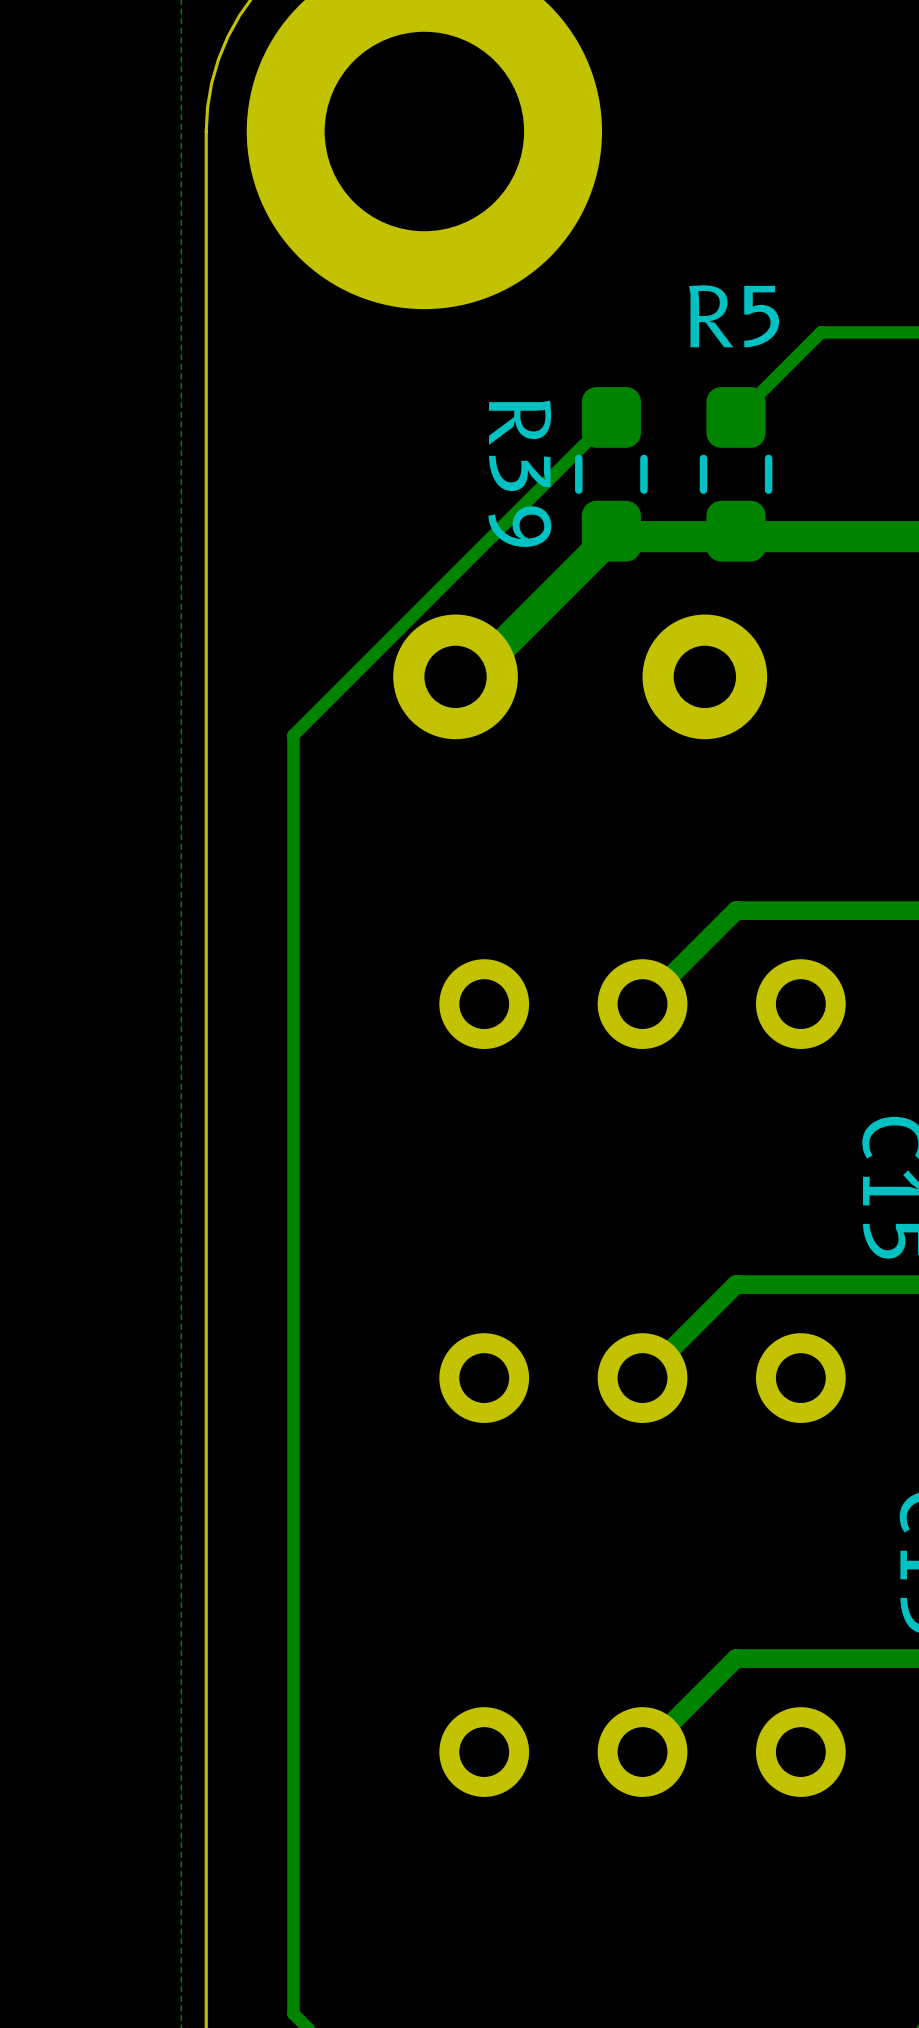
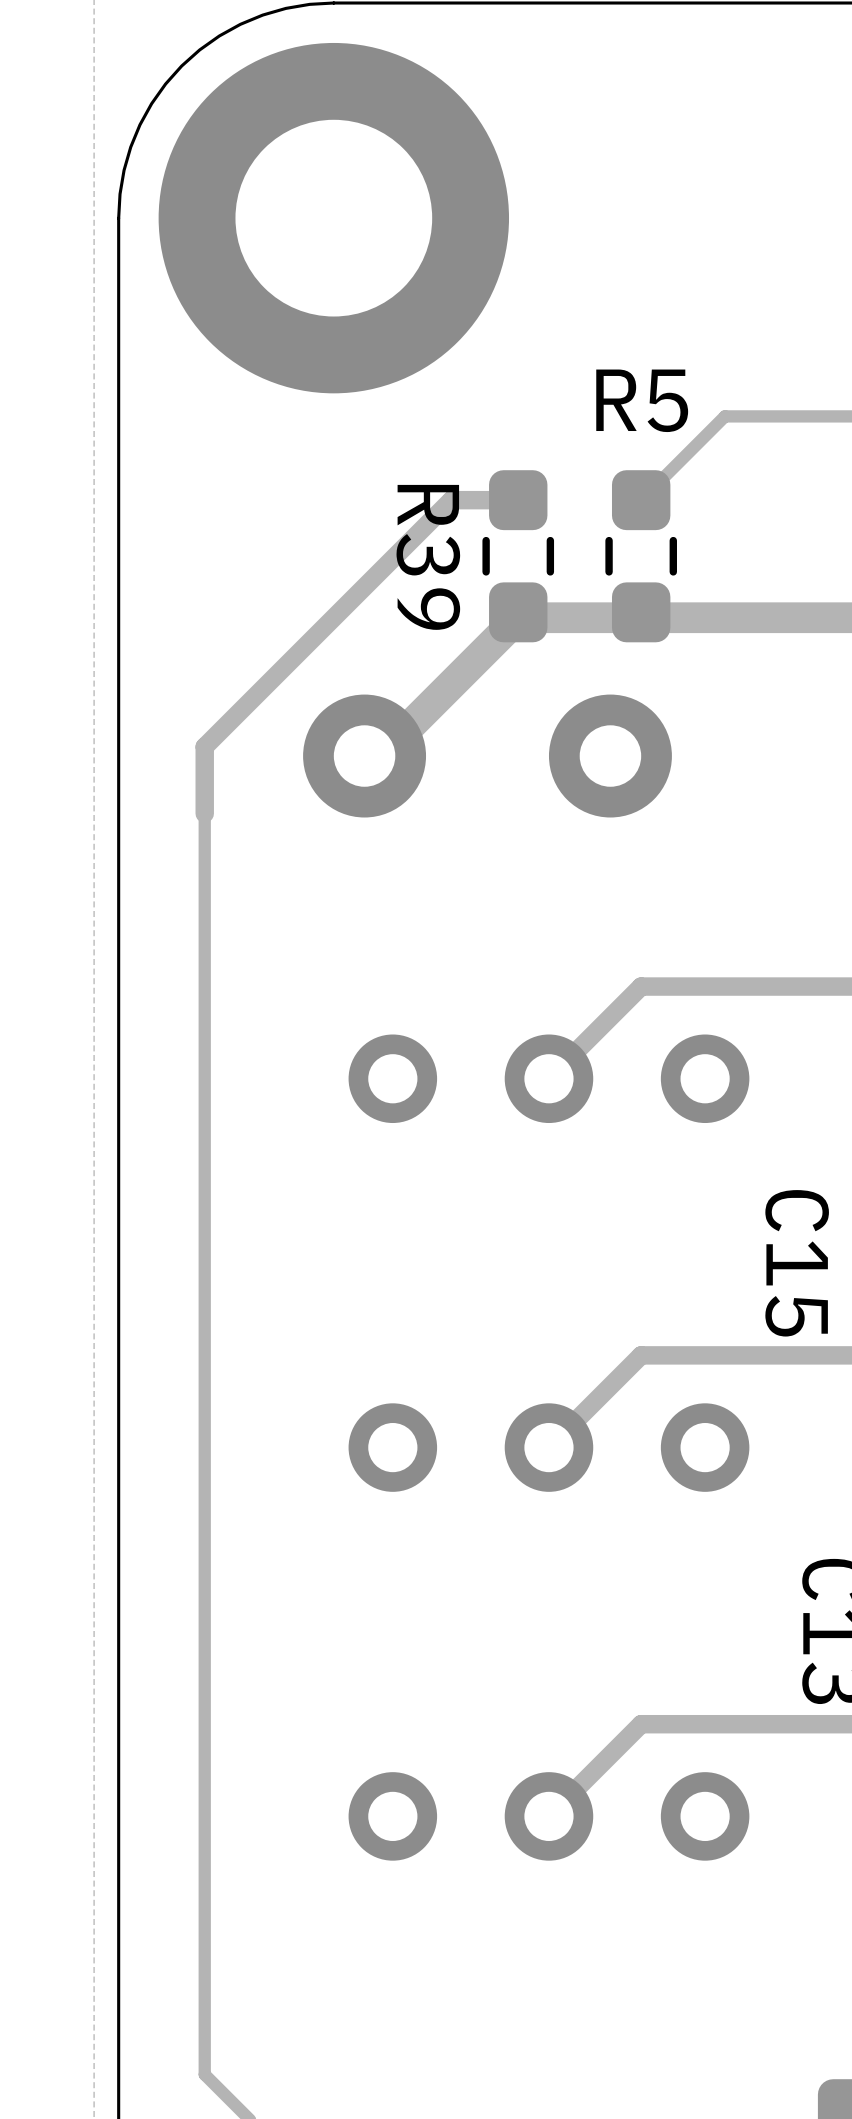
track: (611, 417) (293, 735) -> (518, 500) (451, 500) (204, 746) (204, 813)

